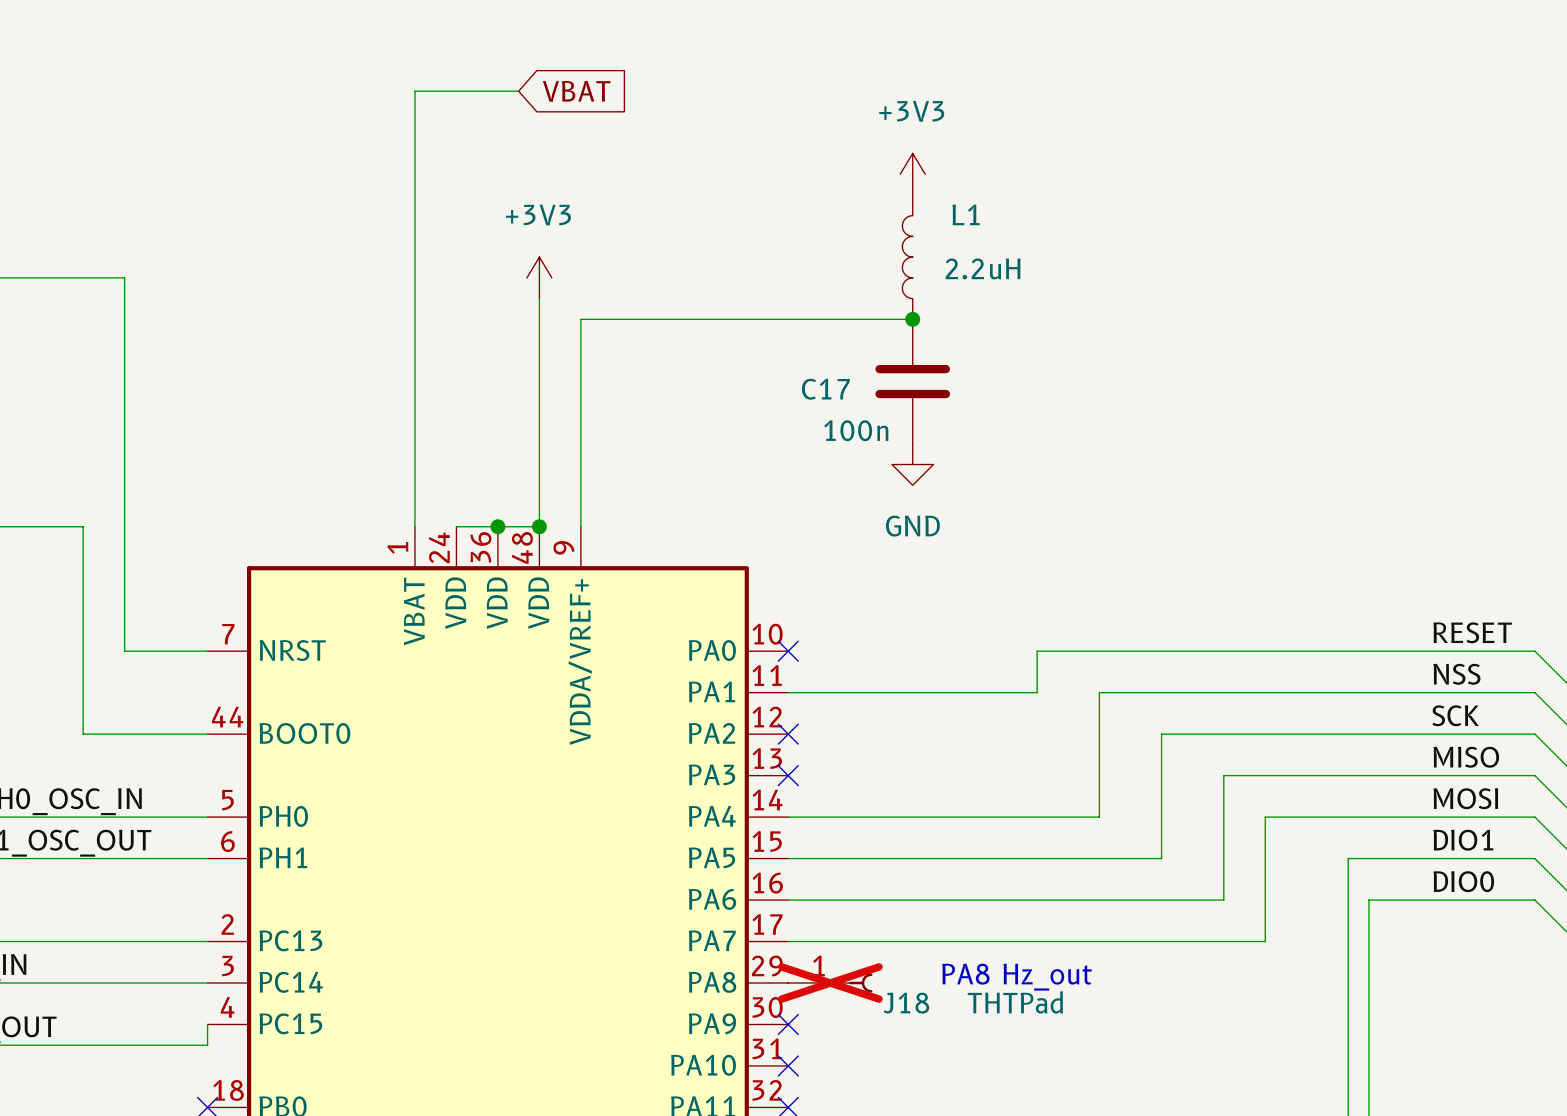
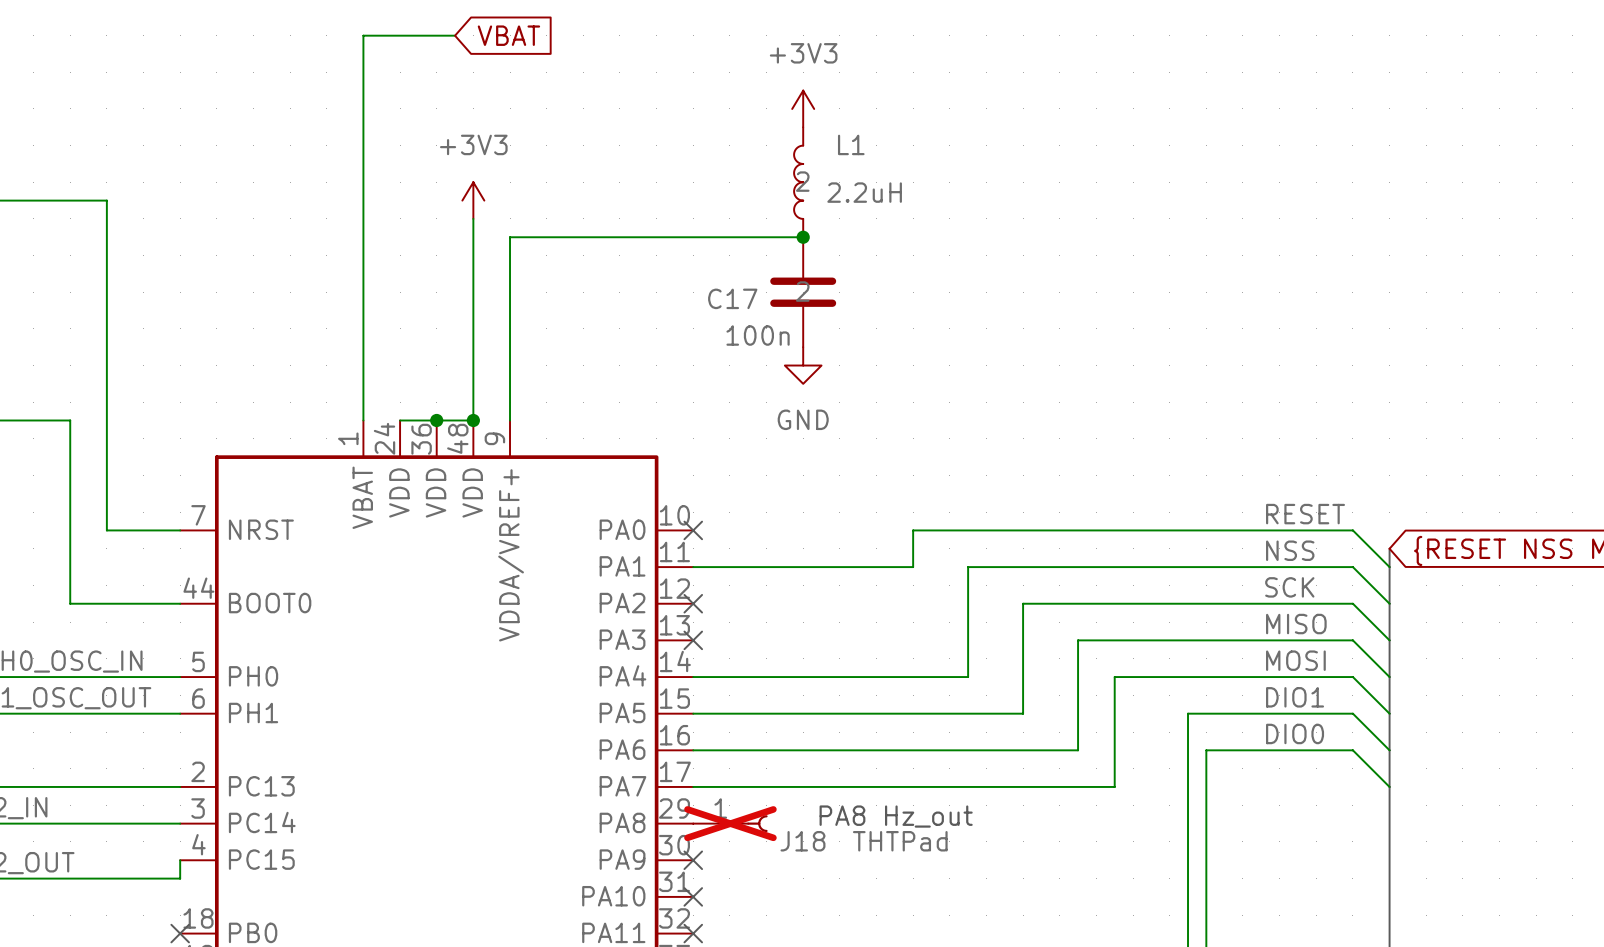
L1 text: none -> 2 (802, 181)
C17 text: none -> 2 (802, 291)

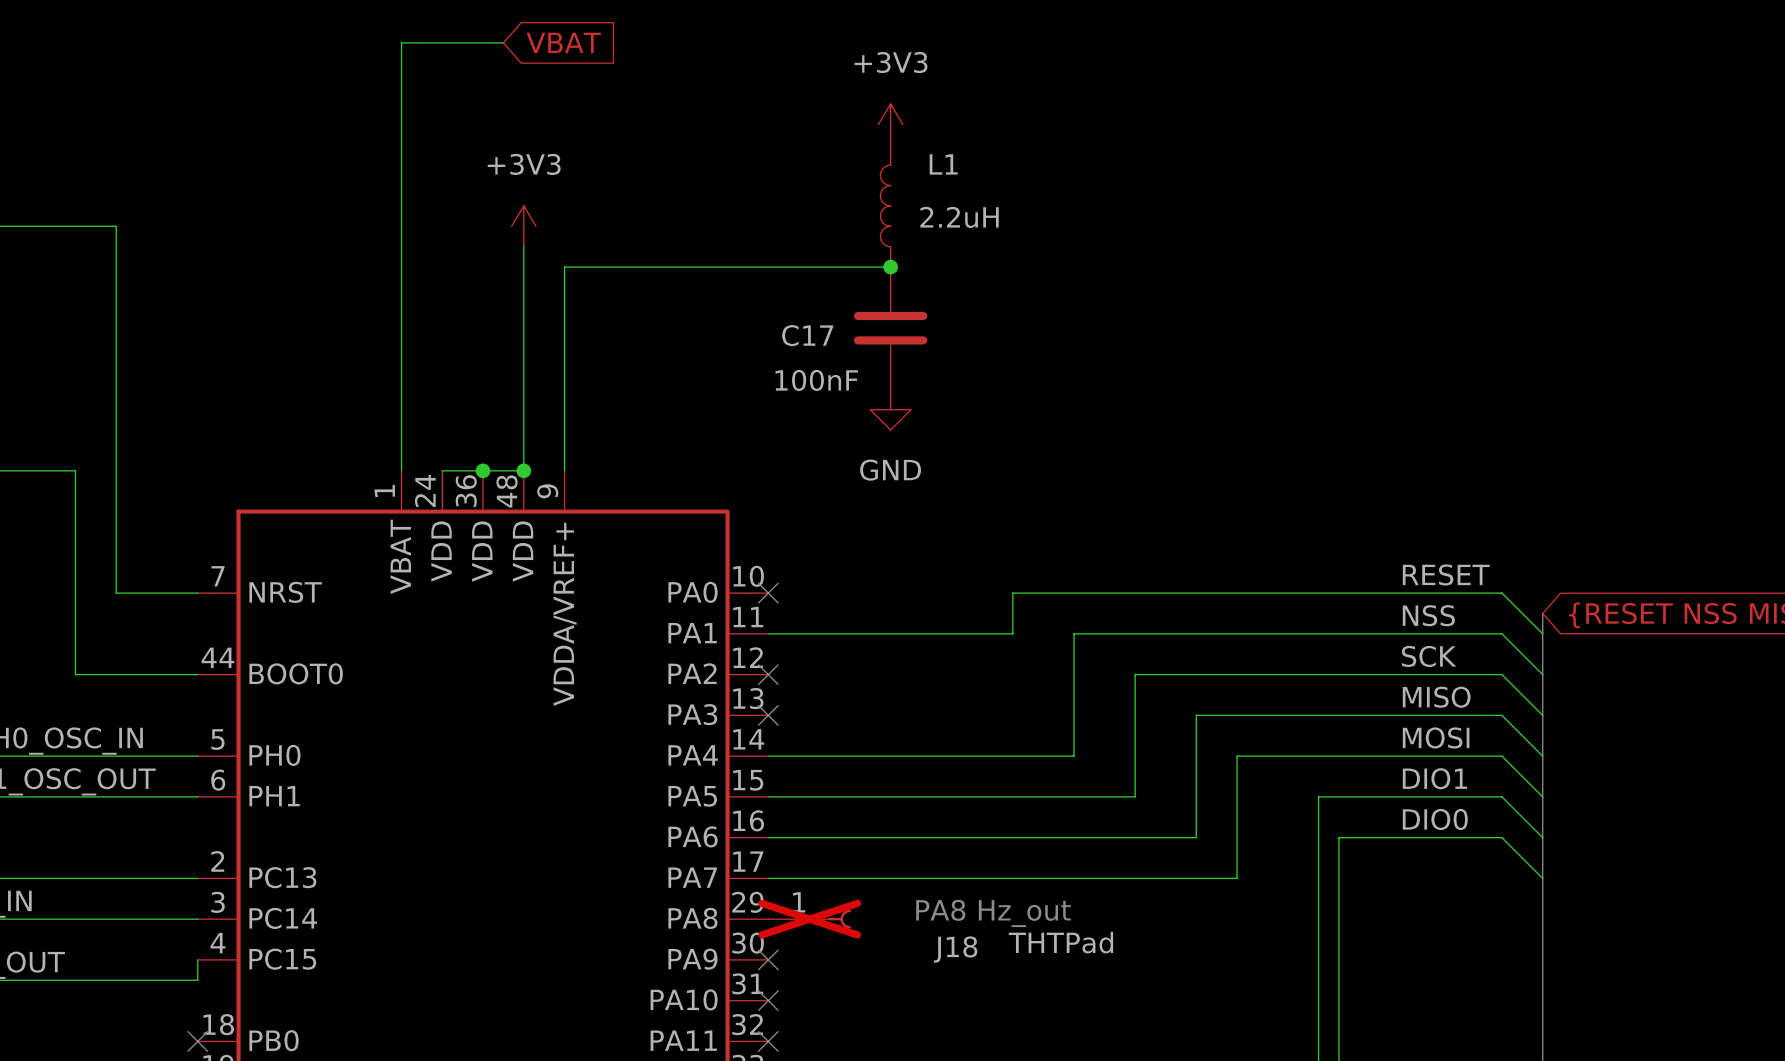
L1 text: 2 (802, 181) -> none
C17 text: 2 (802, 291) -> none
C17 value: 100n (758, 335) -> 100nF (816, 380)
J18 name position: J18 (802, 841) -> J18 (955, 949)
J18 value position: THTPad (900, 841) -> THTPad (1060, 942)

